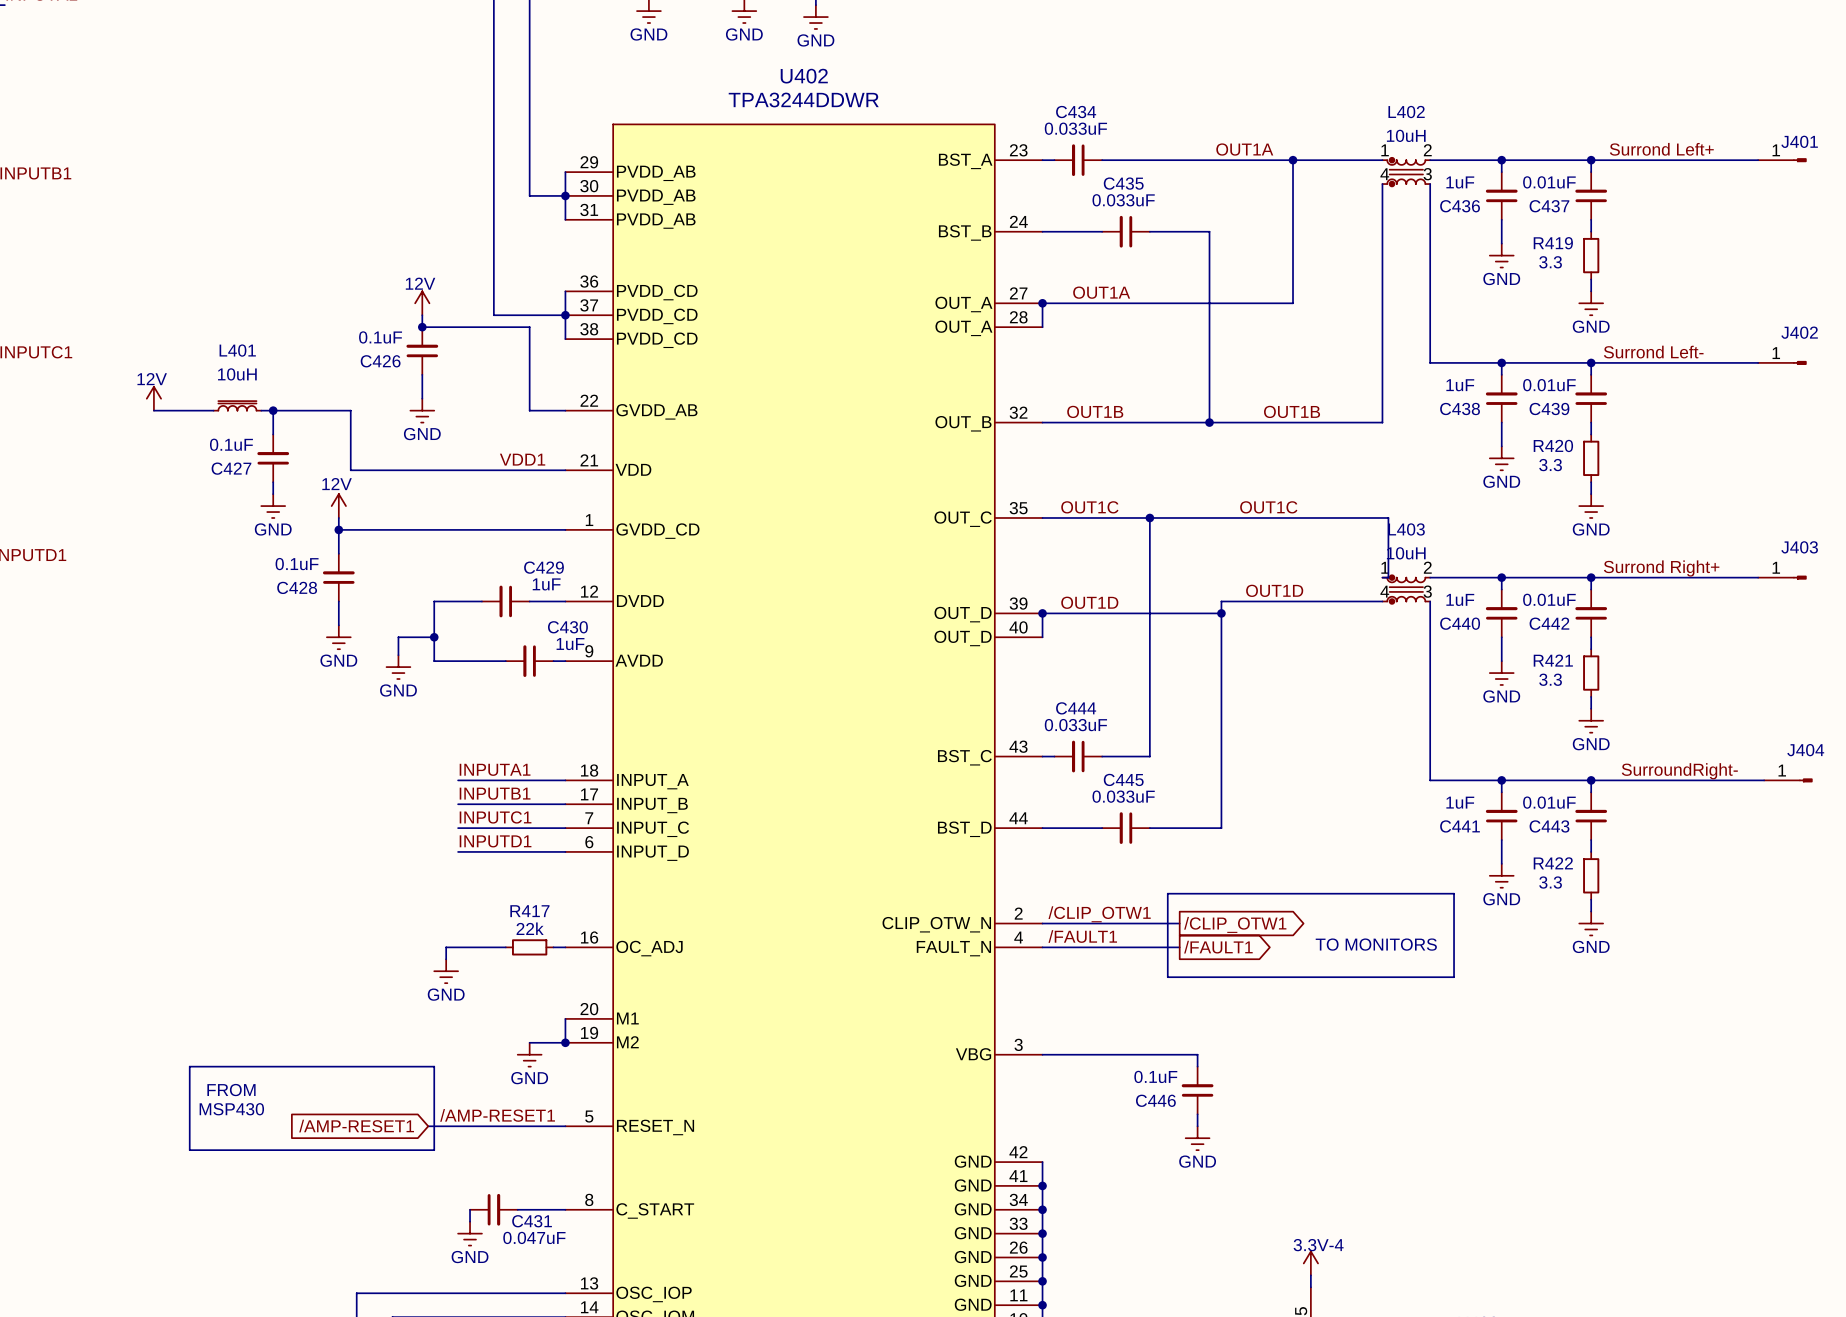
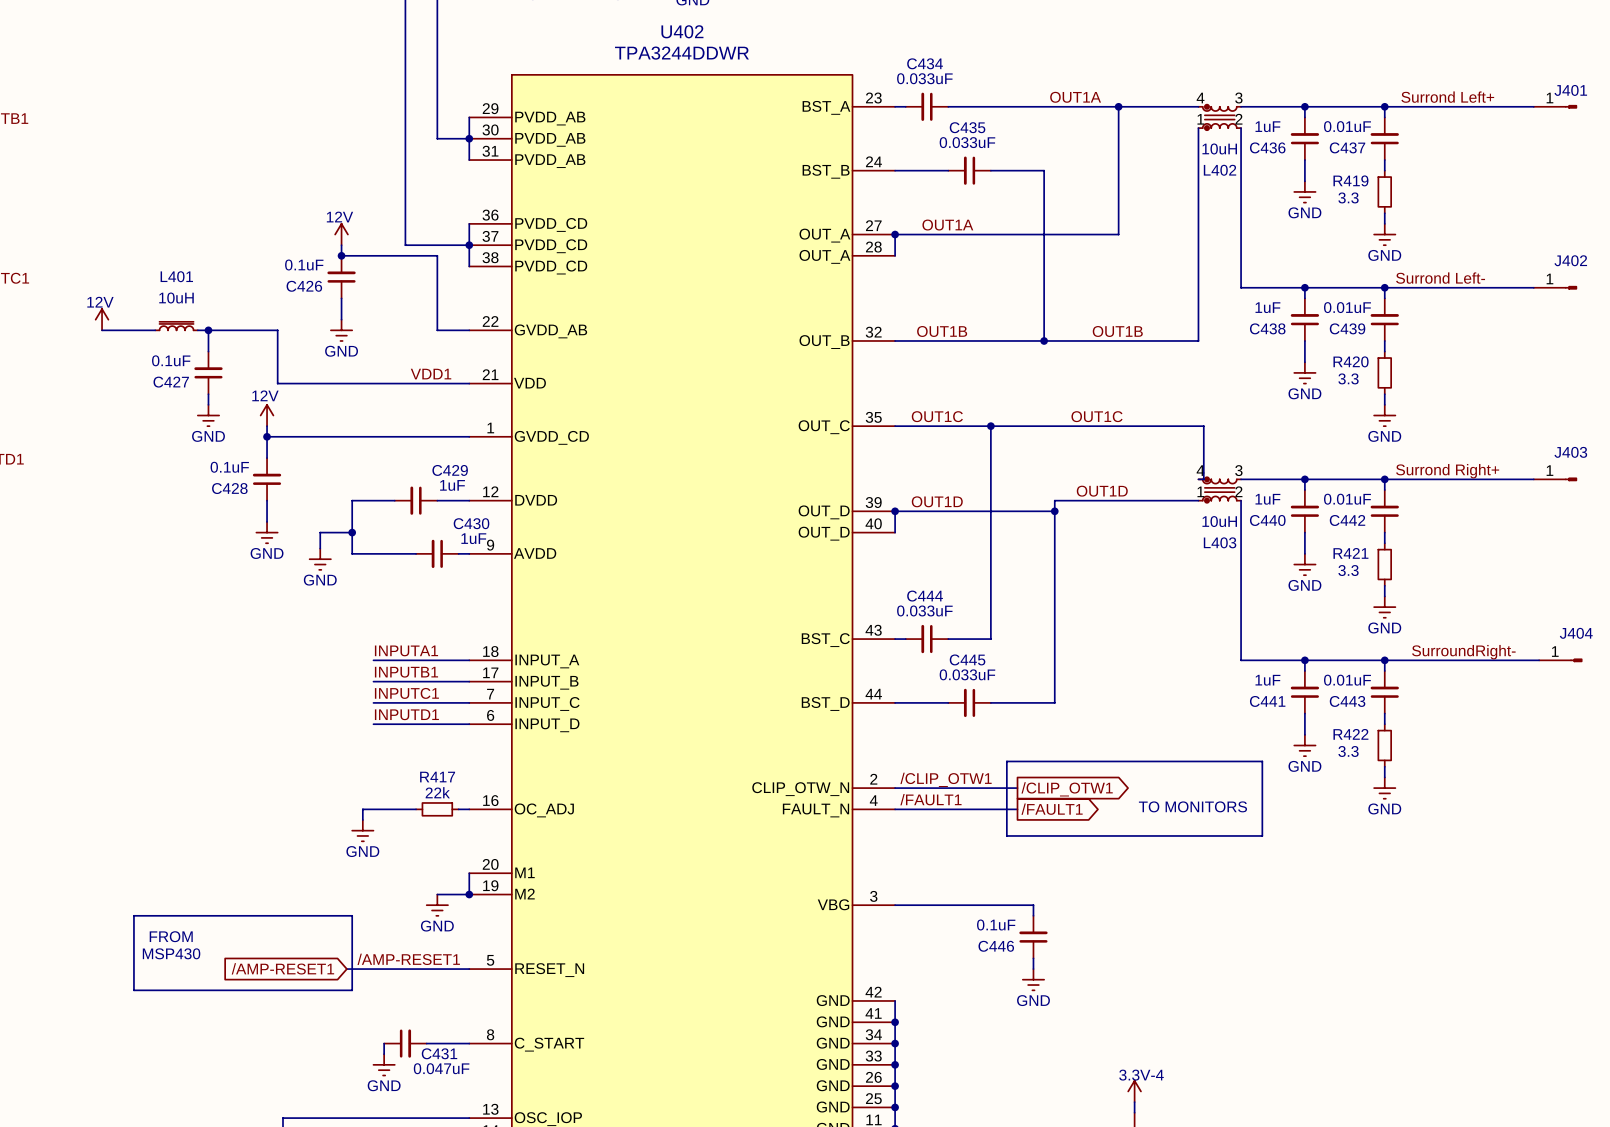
L402 flip: as is (1406, 172) -> up-down (1219, 117)
L403 flip: as is (1406, 589) -> up-down (1219, 490)

